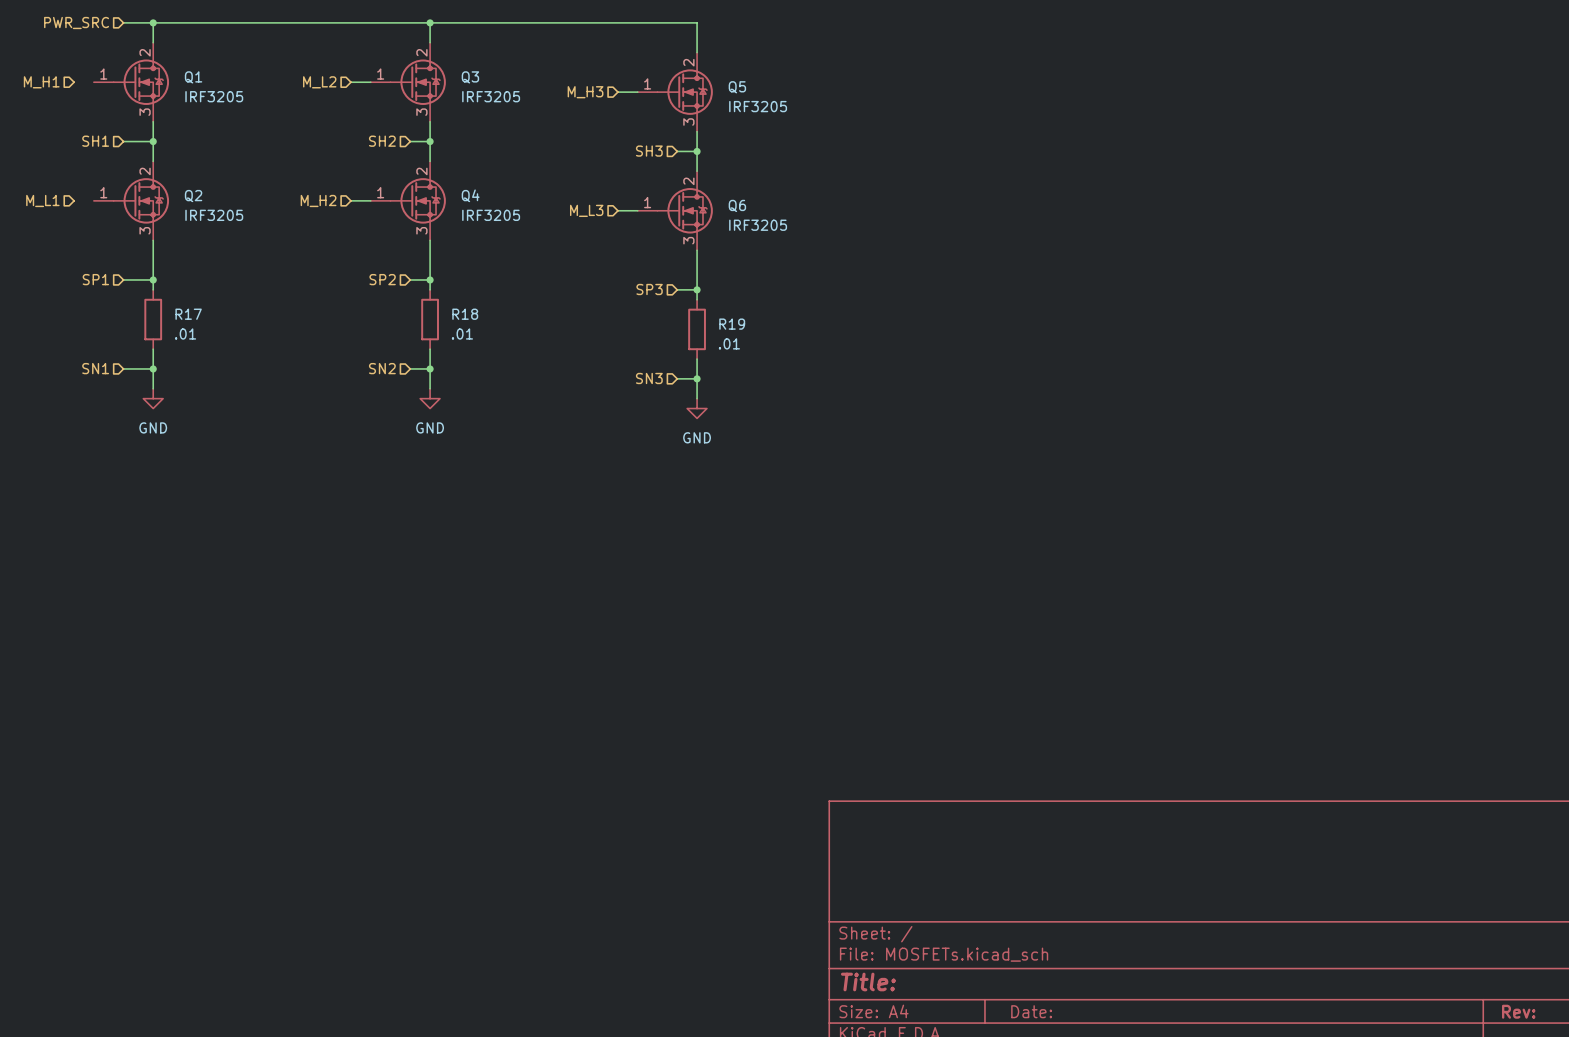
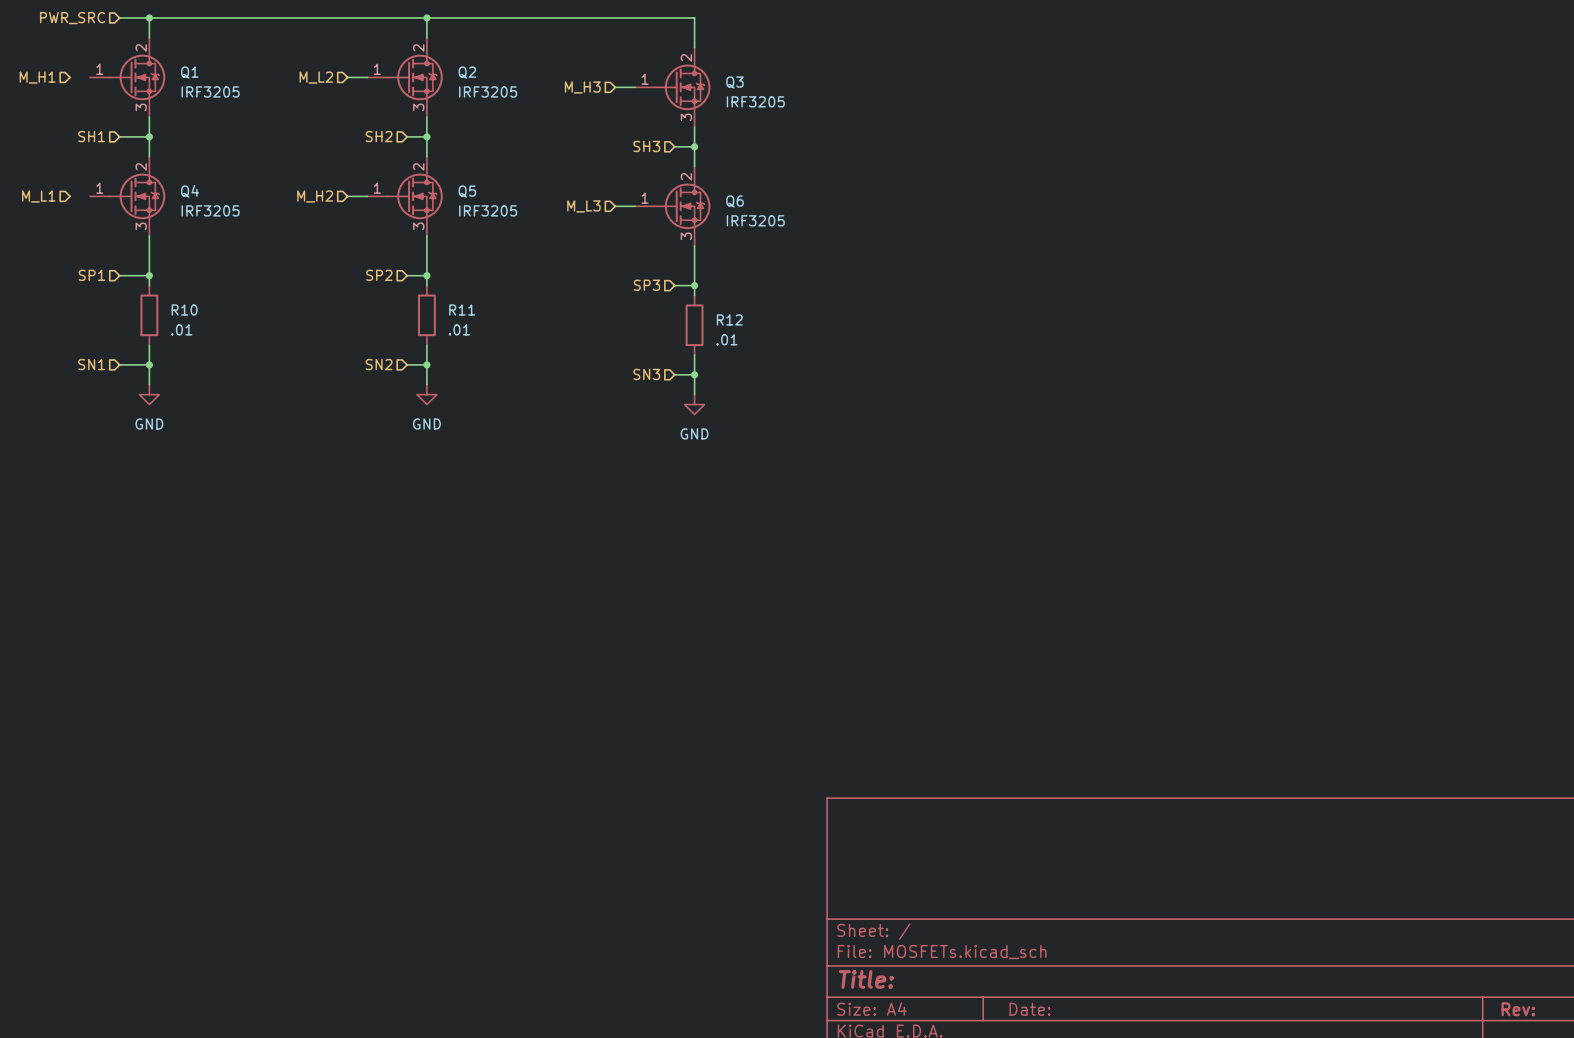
Q3 name: Q3 (470, 77) -> Q2 (467, 72)
Q5 name: Q5 (737, 87) -> Q3 (734, 82)
Q4 name: Q4 (470, 195) -> Q5 (467, 191)
Q2 name: Q2 (193, 196) -> Q4 (190, 191)
R17 name: R17 (188, 314) -> R10 (184, 310)
R18 name: R18 (465, 314) -> R11 (462, 310)
R19 name: R19 (732, 324) -> R12 (729, 319)

